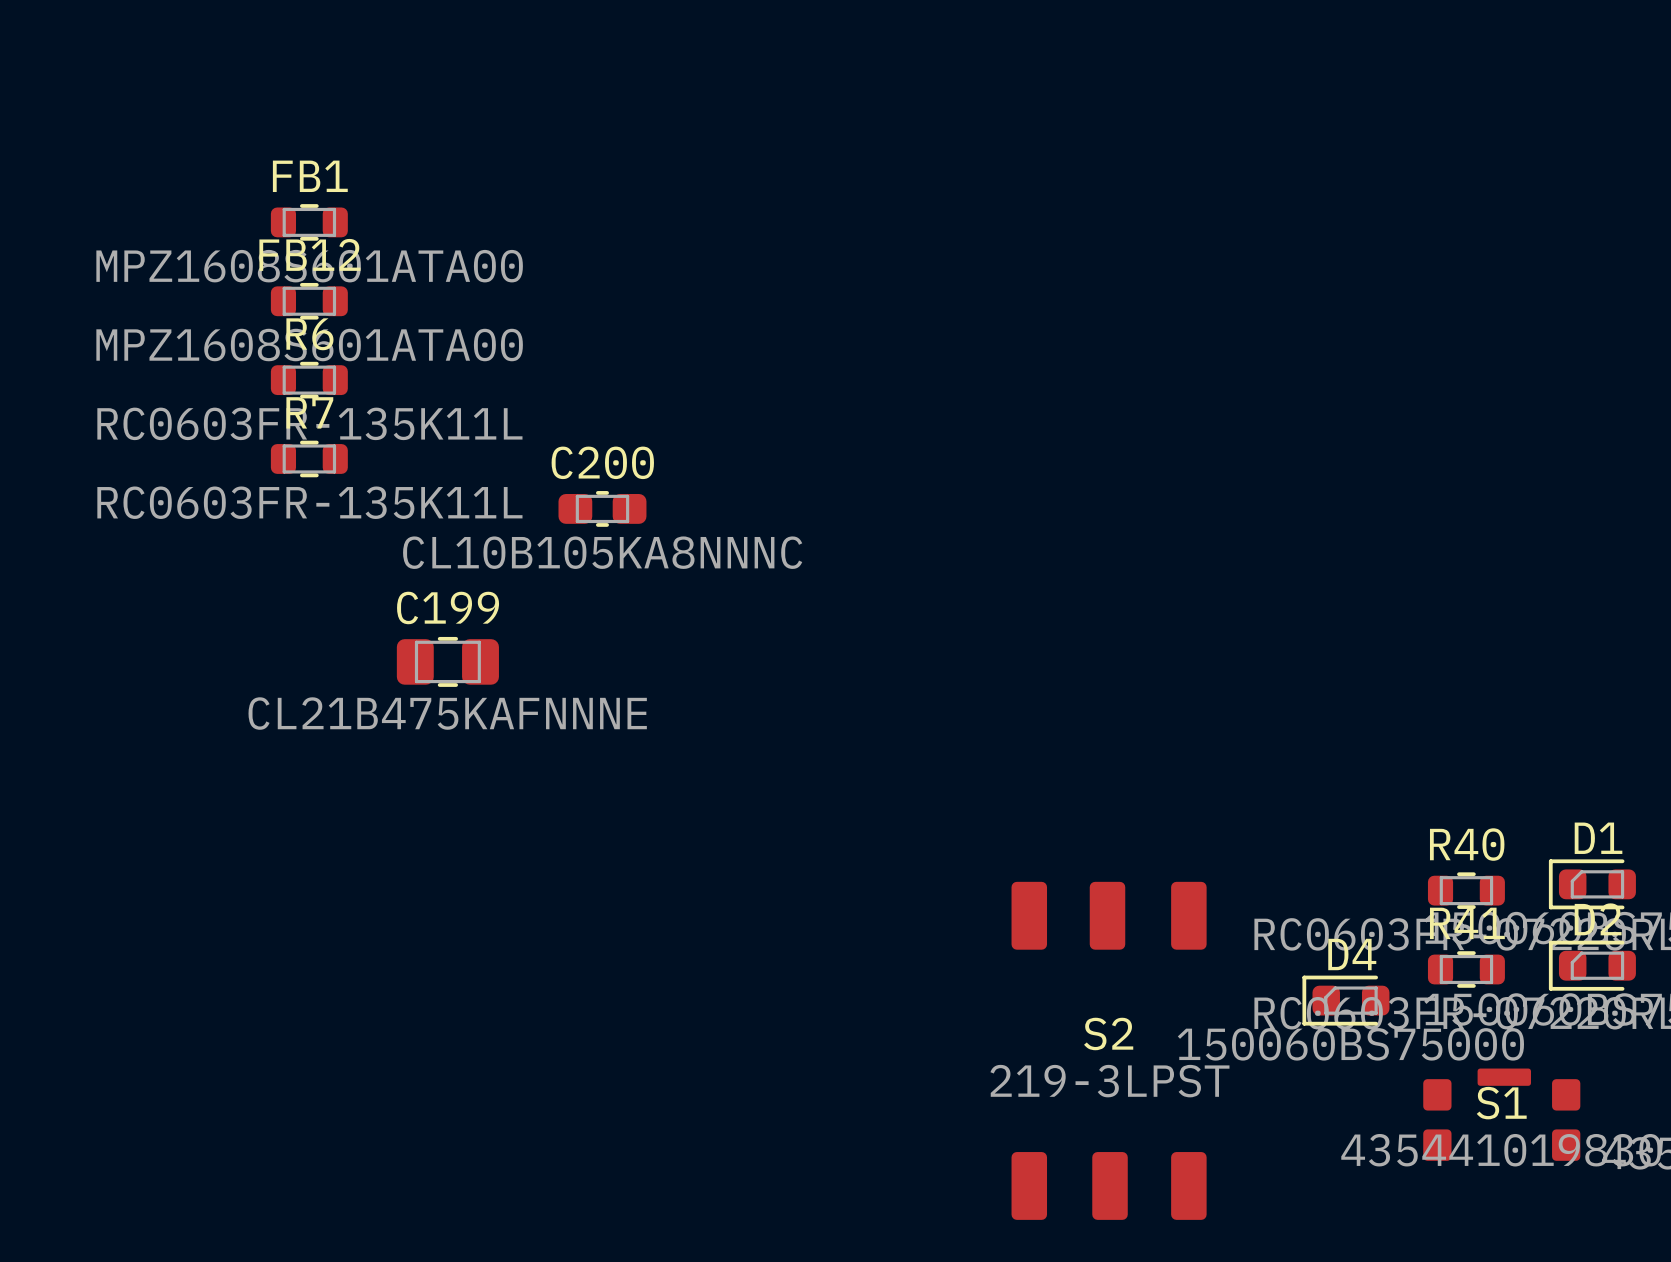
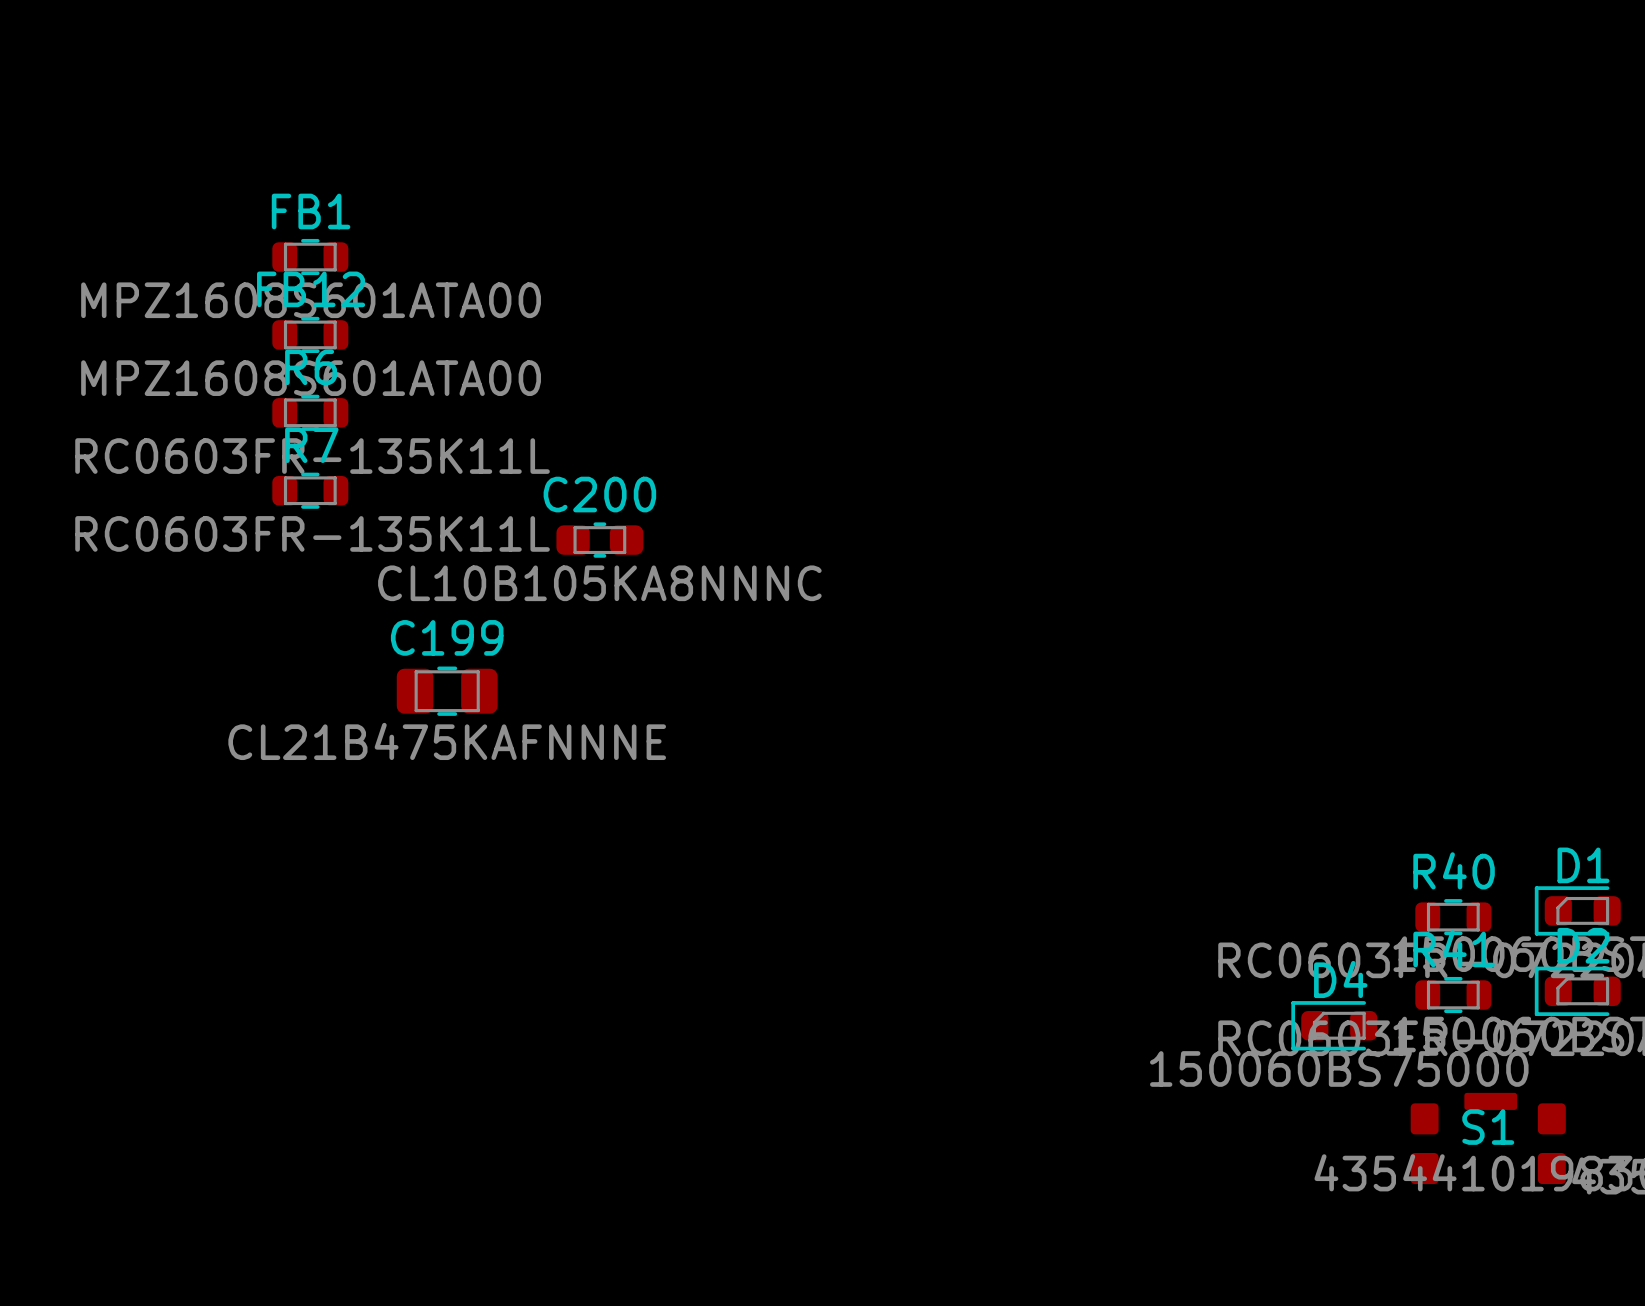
S2: 219-3LPST (1109, 1050) -> none

